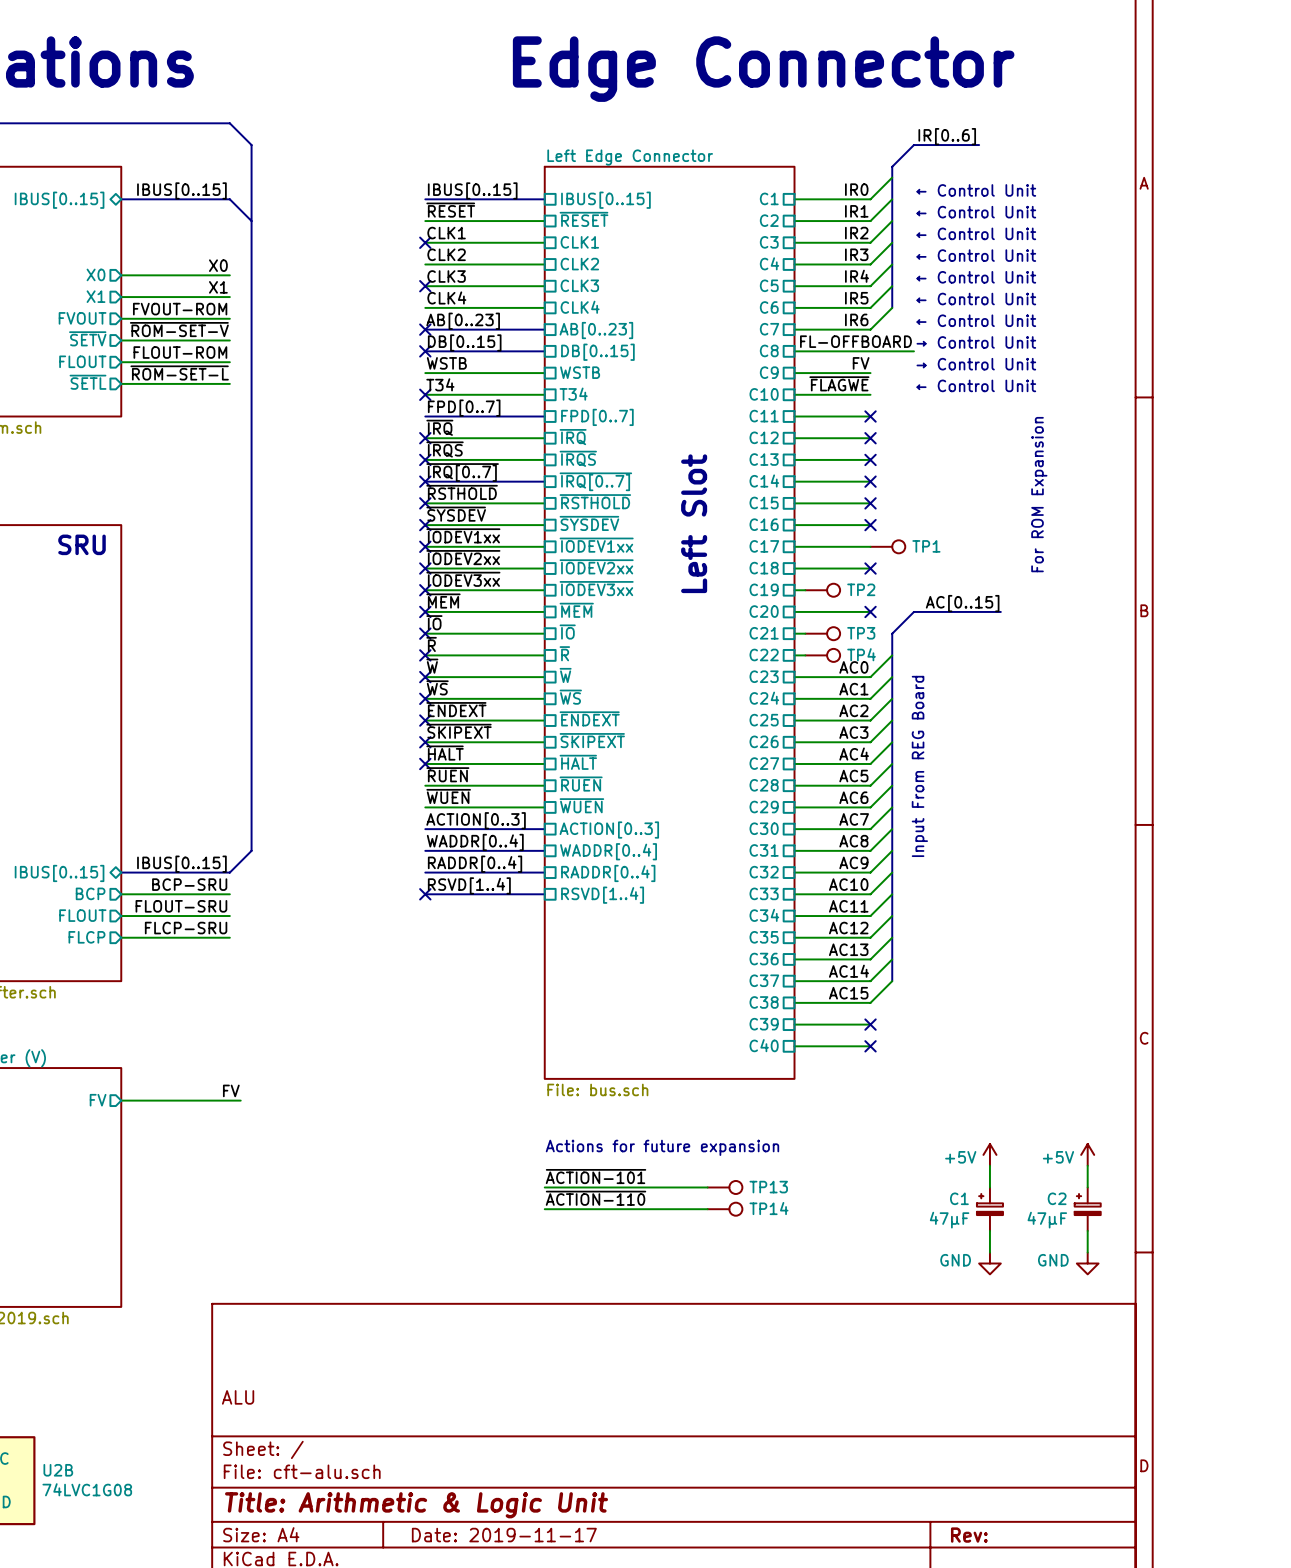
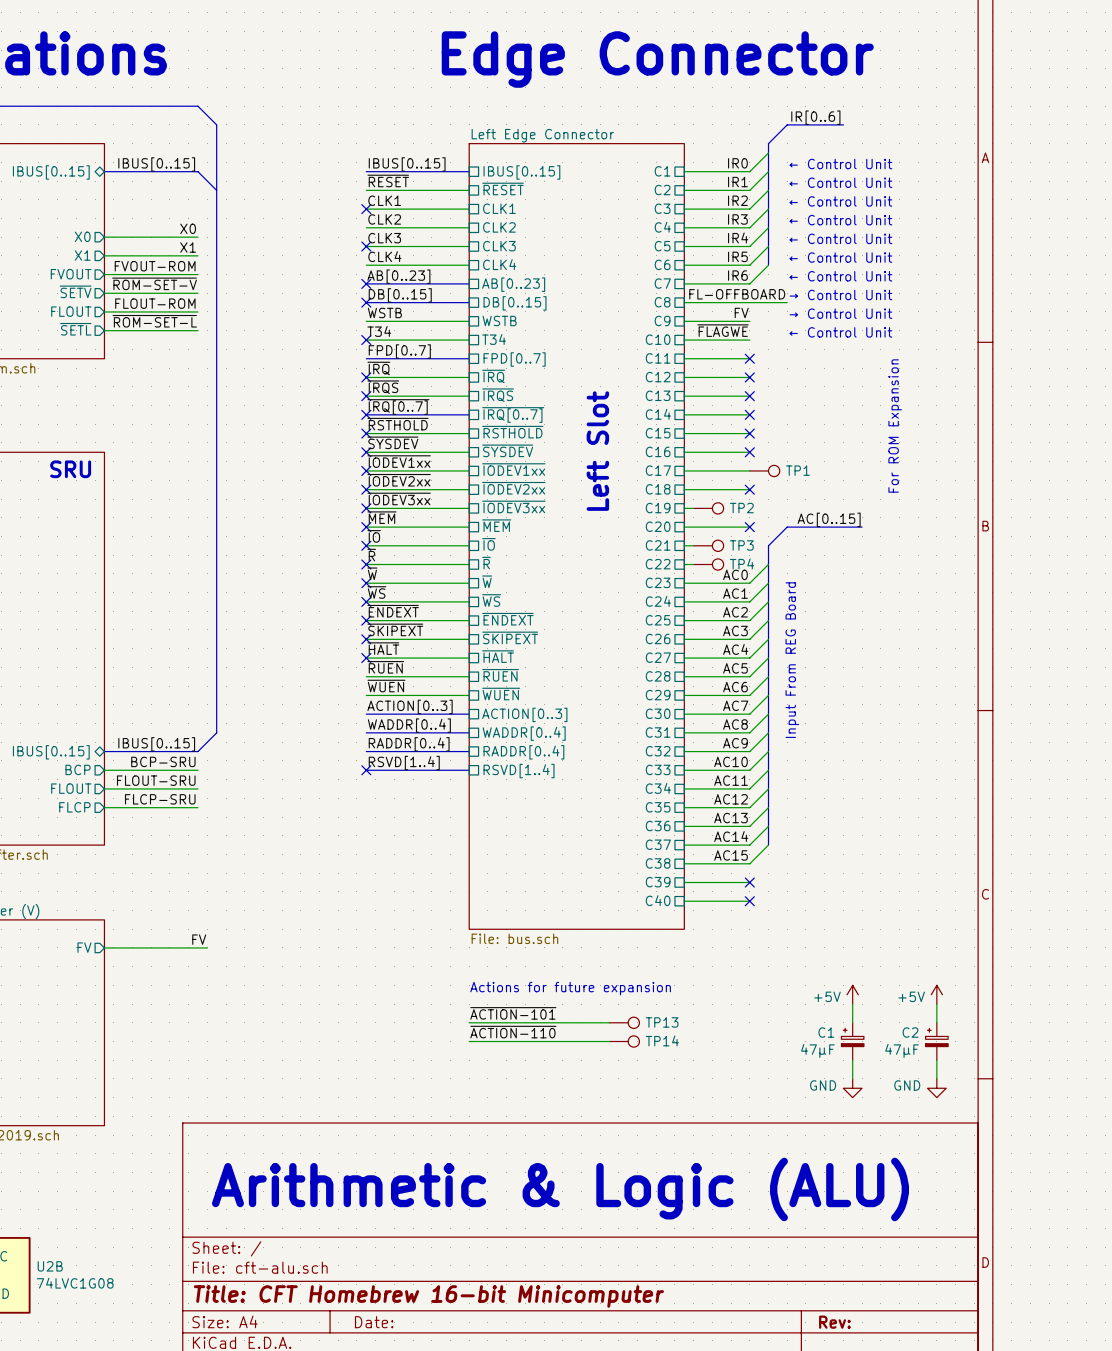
text: none -> Arithmetic & Logic (ALU) (560, 1189)
title block: ALU (238, 1397) -> none
title block: Title: Arithmetic & Logic Unit (416, 1505) -> Title: CFT Homebrew 16-bit Minicomputer (428, 1296)
title block: Date: 2019-11-17 (504, 1535) -> Date: (374, 1322)

